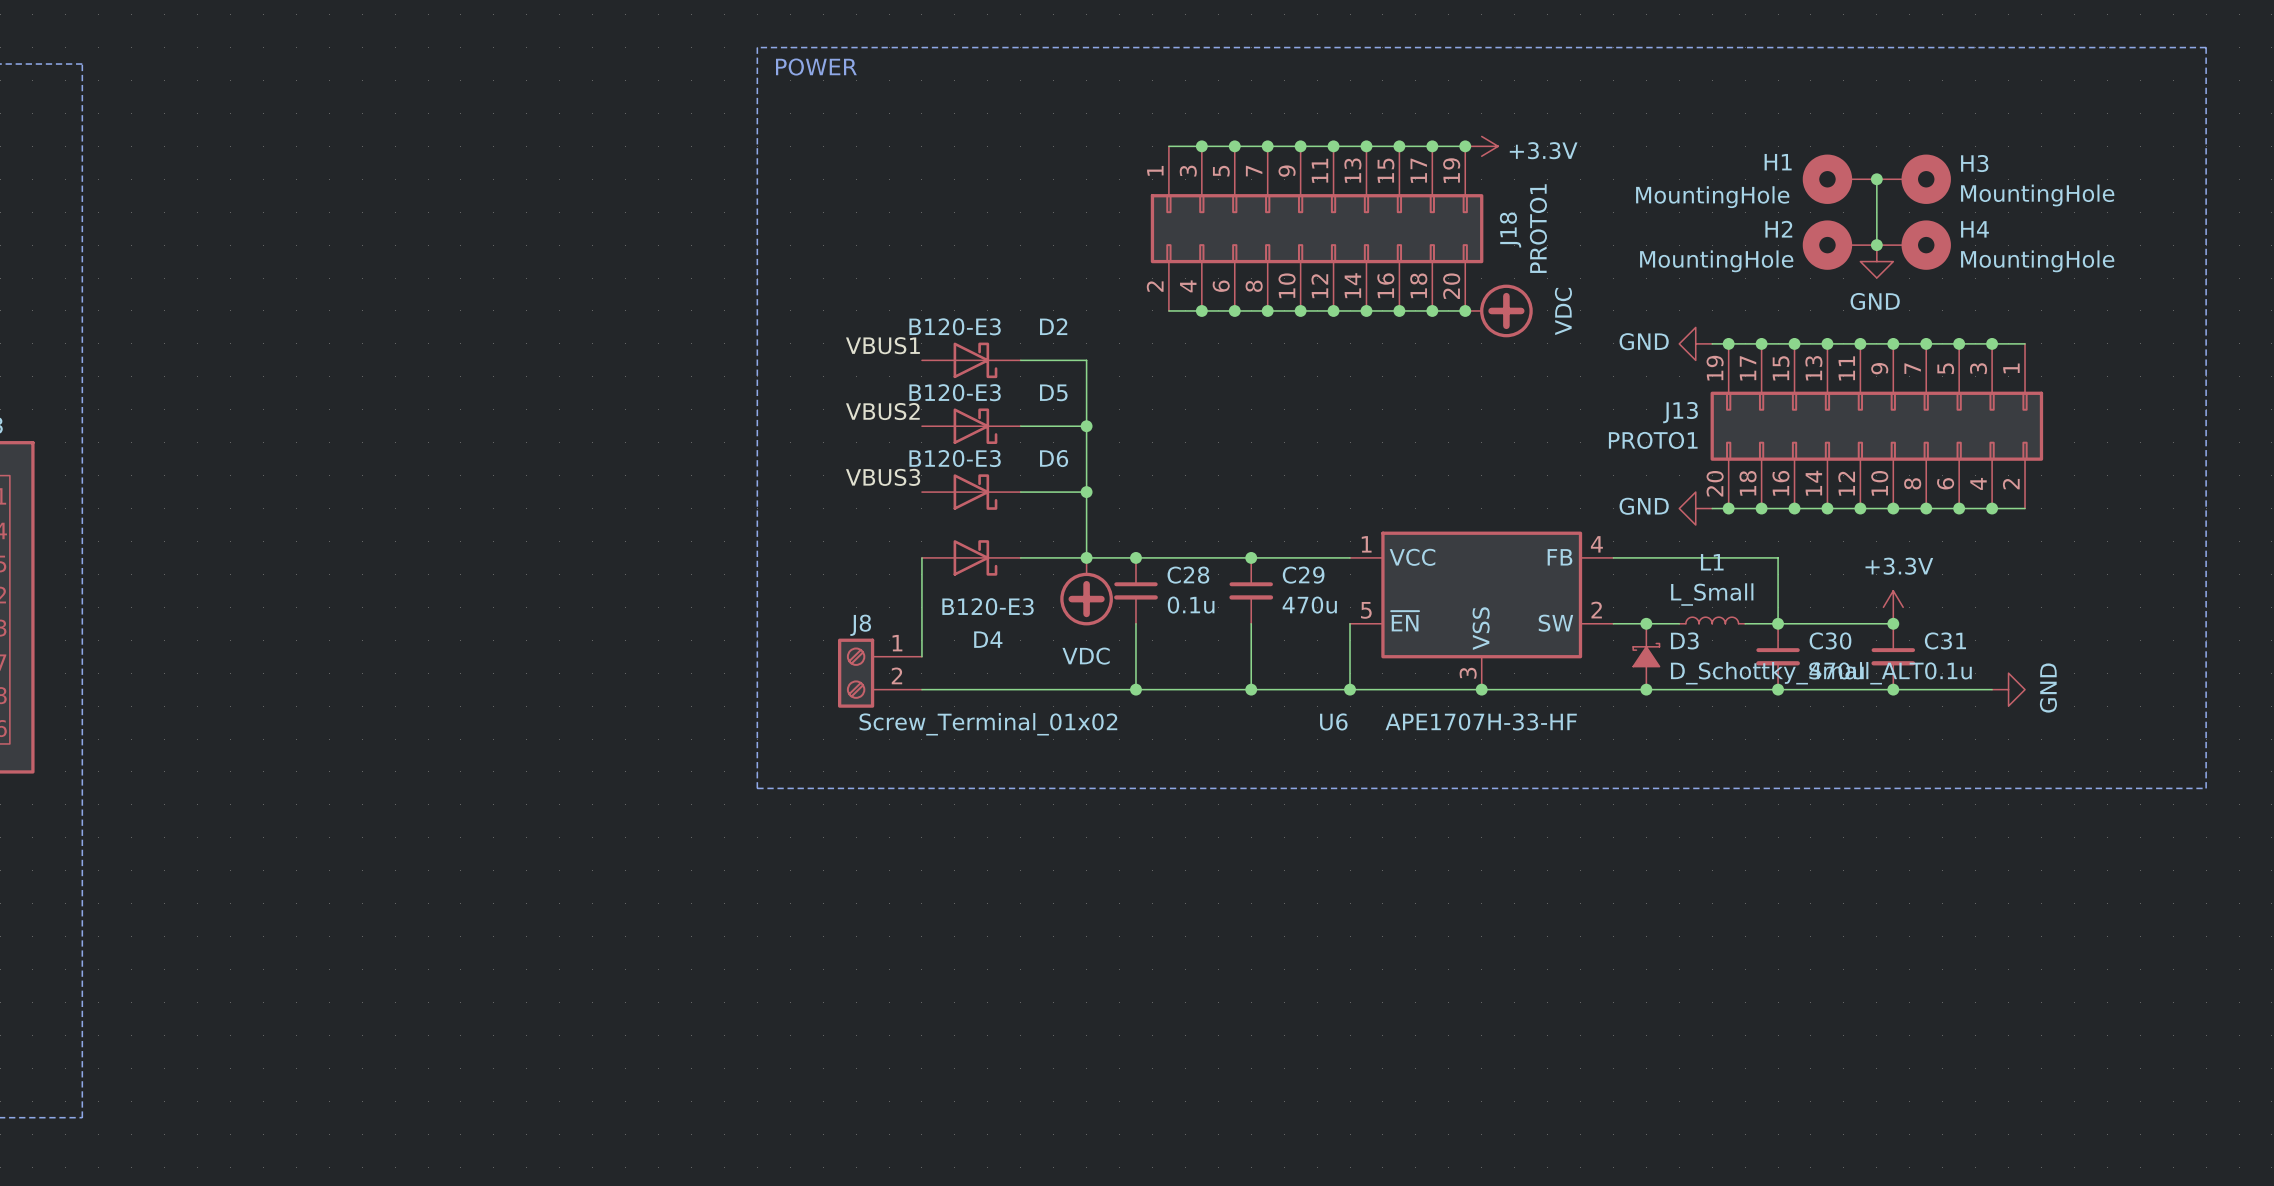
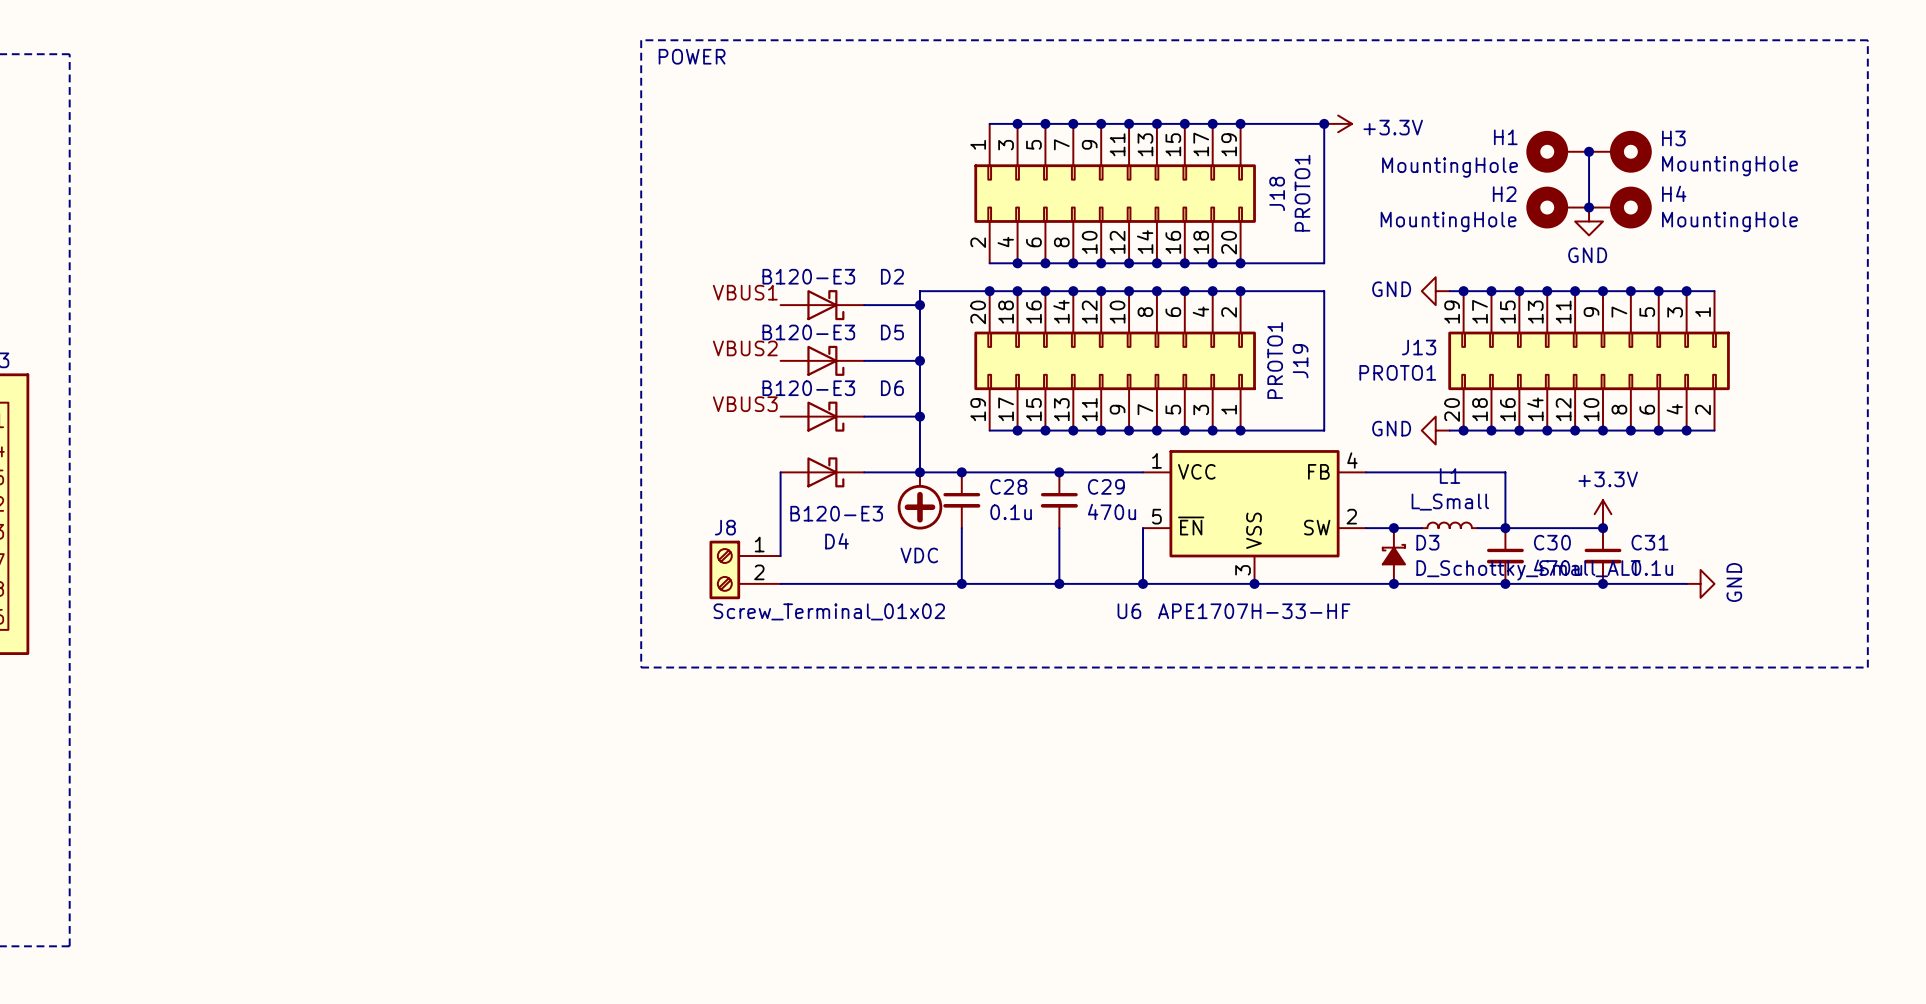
wire: none -> (1240, 123) (1324, 123) (1324, 263) (1240, 263)
power symbol position: +3.3V (1481, 146) -> +3.3V (1338, 123)
junction: none -> (1324, 123)
power symbol: VDC (1499, 310) -> none
junction: none -> (989, 291)
junction: none -> (1017, 291)
junction: none -> (1045, 291)
junction: none -> (1073, 291)
junction: none -> (1101, 291)
junction: none -> (1129, 291)
junction: none -> (1156, 291)
junction: none -> (1184, 291)
junction: none -> (1212, 291)
junction: none -> (1240, 291)
wire: none -> (919, 305) (919, 291) (1324, 291) (1324, 430) (989, 430)
junction: none -> (919, 305)
J19: none -> PROTO1 (1115, 360)
junction: none -> (1017, 430)
junction: none -> (1045, 430)
junction: none -> (1073, 430)
junction: none -> (1101, 430)
junction: none -> (1129, 430)
junction: none -> (1156, 430)
junction: none -> (1184, 430)
junction: none -> (1212, 430)
junction: none -> (1240, 430)

